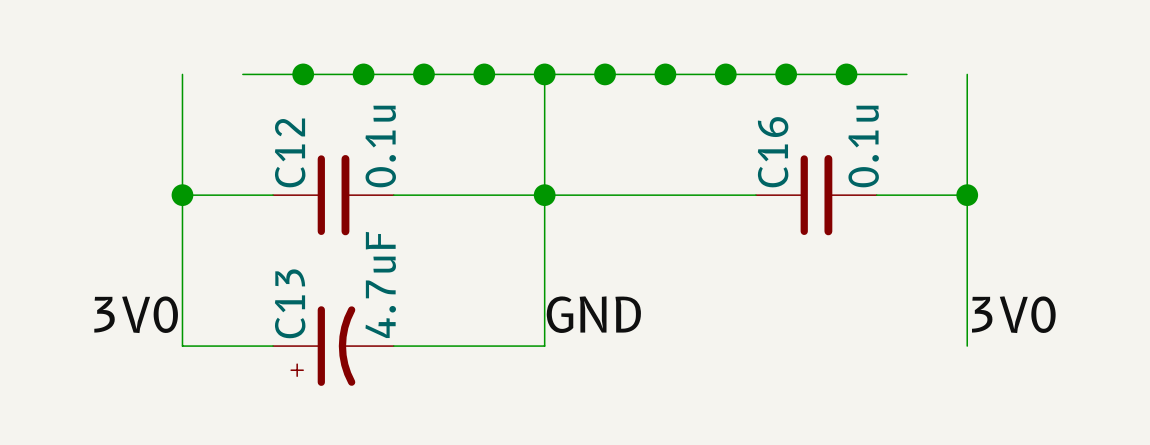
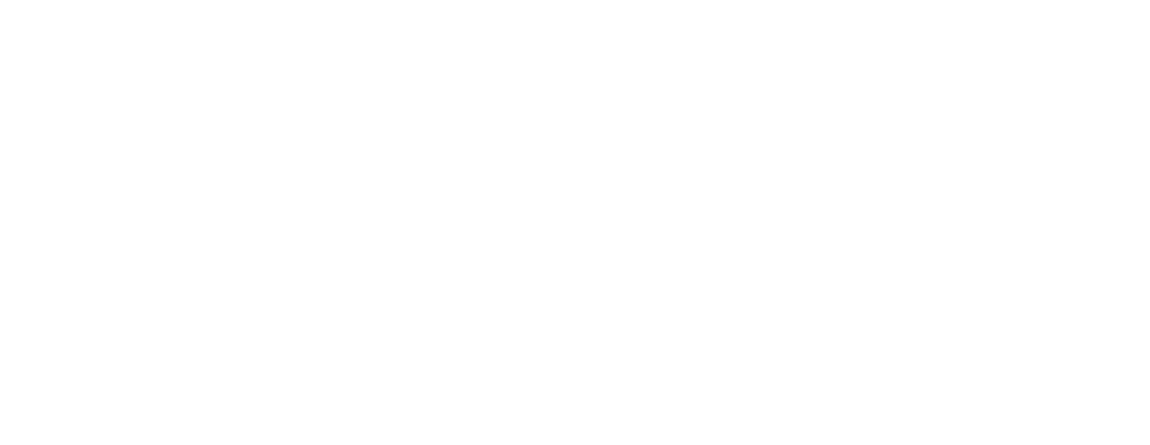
wire: (182, 74) (182, 346) (273, 346) -> none
wire: (242, 74) (906, 74) -> none
junction: (303, 74) -> none
junction: (363, 74) -> none
junction: (423, 74) -> none
junction: (484, 74) -> none
wire: (544, 74) (544, 346) (393, 346) -> none
junction: (544, 74) -> none
junction: (605, 74) -> none
junction: (665, 74) -> none
junction: (725, 74) -> none
junction: (786, 74) -> none
junction: (846, 74) -> none
wire: (967, 74) (967, 346) -> none
wire: (182, 195) (273, 195) -> none
junction: (182, 195) -> none
C12: 0.1u (333, 195) -> none
wire: (393, 195) (755, 195) -> none
junction: (544, 195) -> none
C16: 0.1u (816, 195) -> none
wire: (876, 195) (967, 195) -> none
junction: (967, 195) -> none
label: 3V0 (136, 314) -> none
label: GND (593, 314) -> none
label: 3V0 (1013, 314) -> none
C13: 4.7uF (333, 346) -> none

